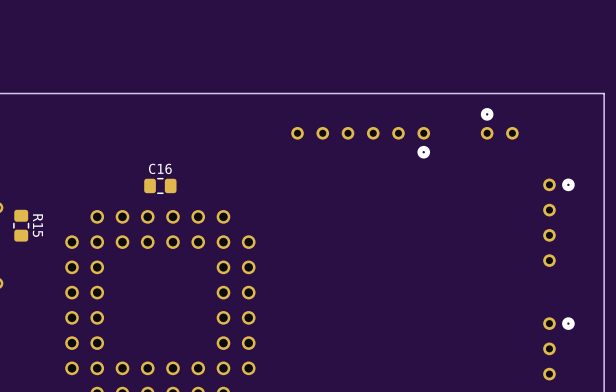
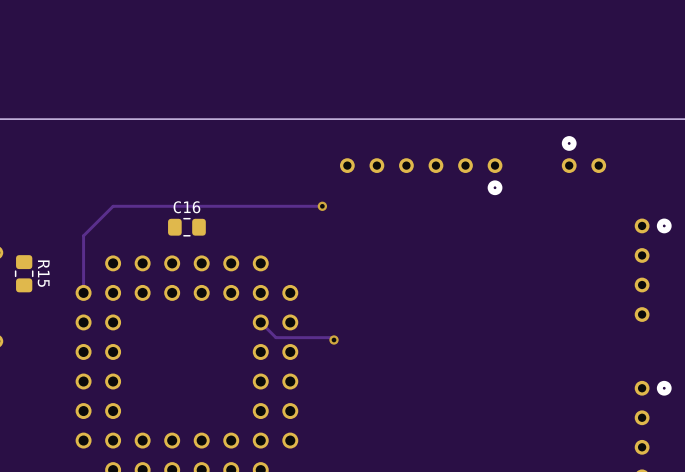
track: none -> (322, 206) (113, 206) (83, 235) (83, 292)
via: none -> (322, 206)
track: none -> (260, 322) (275, 337) (331, 337) (334, 340)
via: none -> (334, 340)

